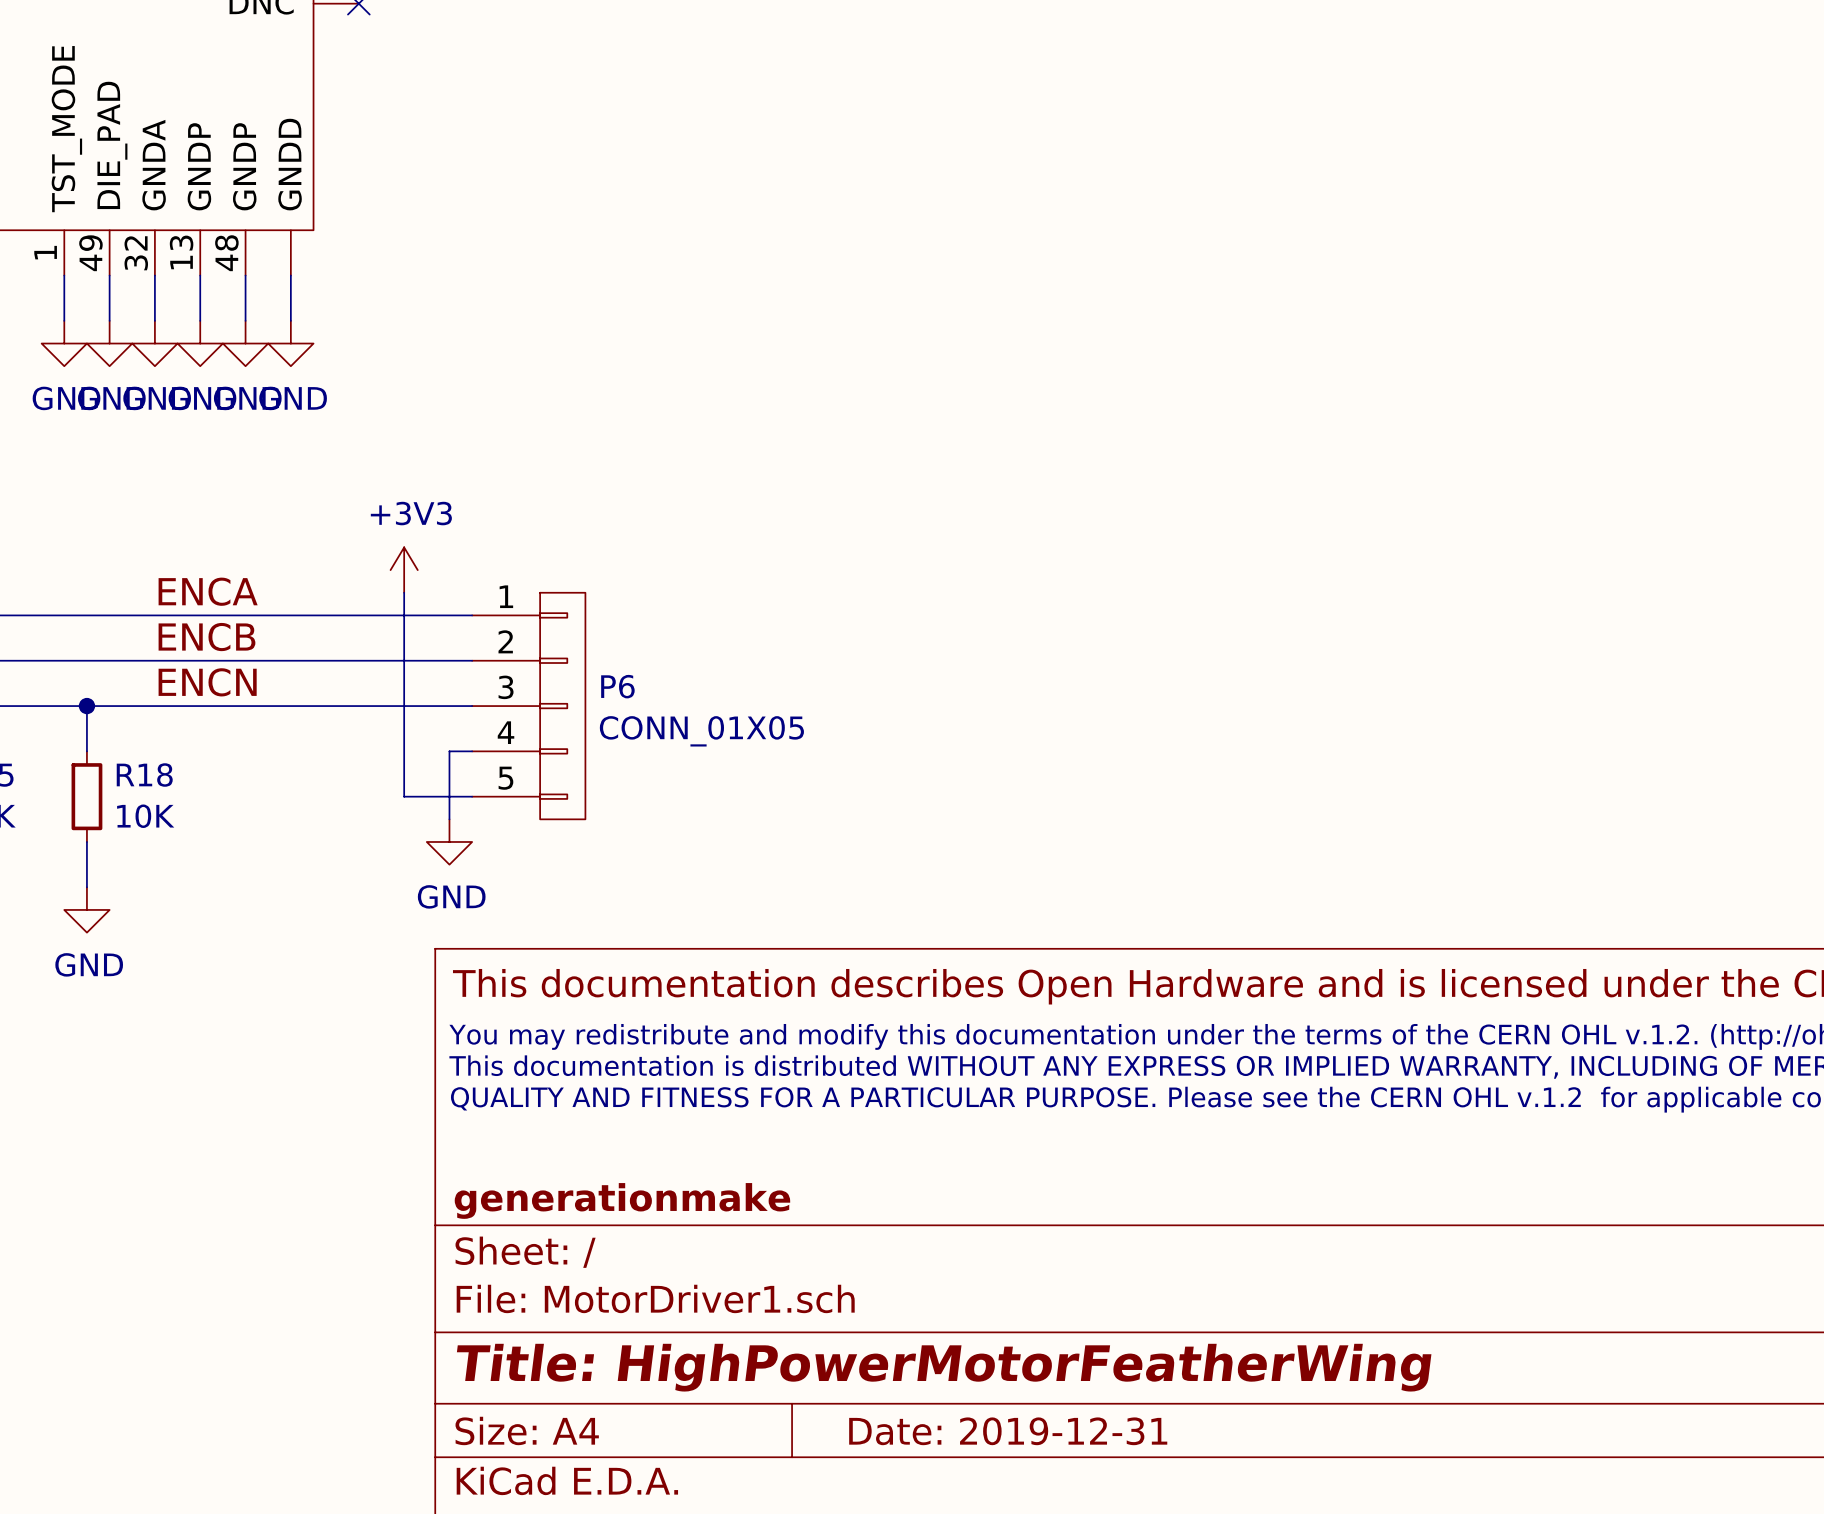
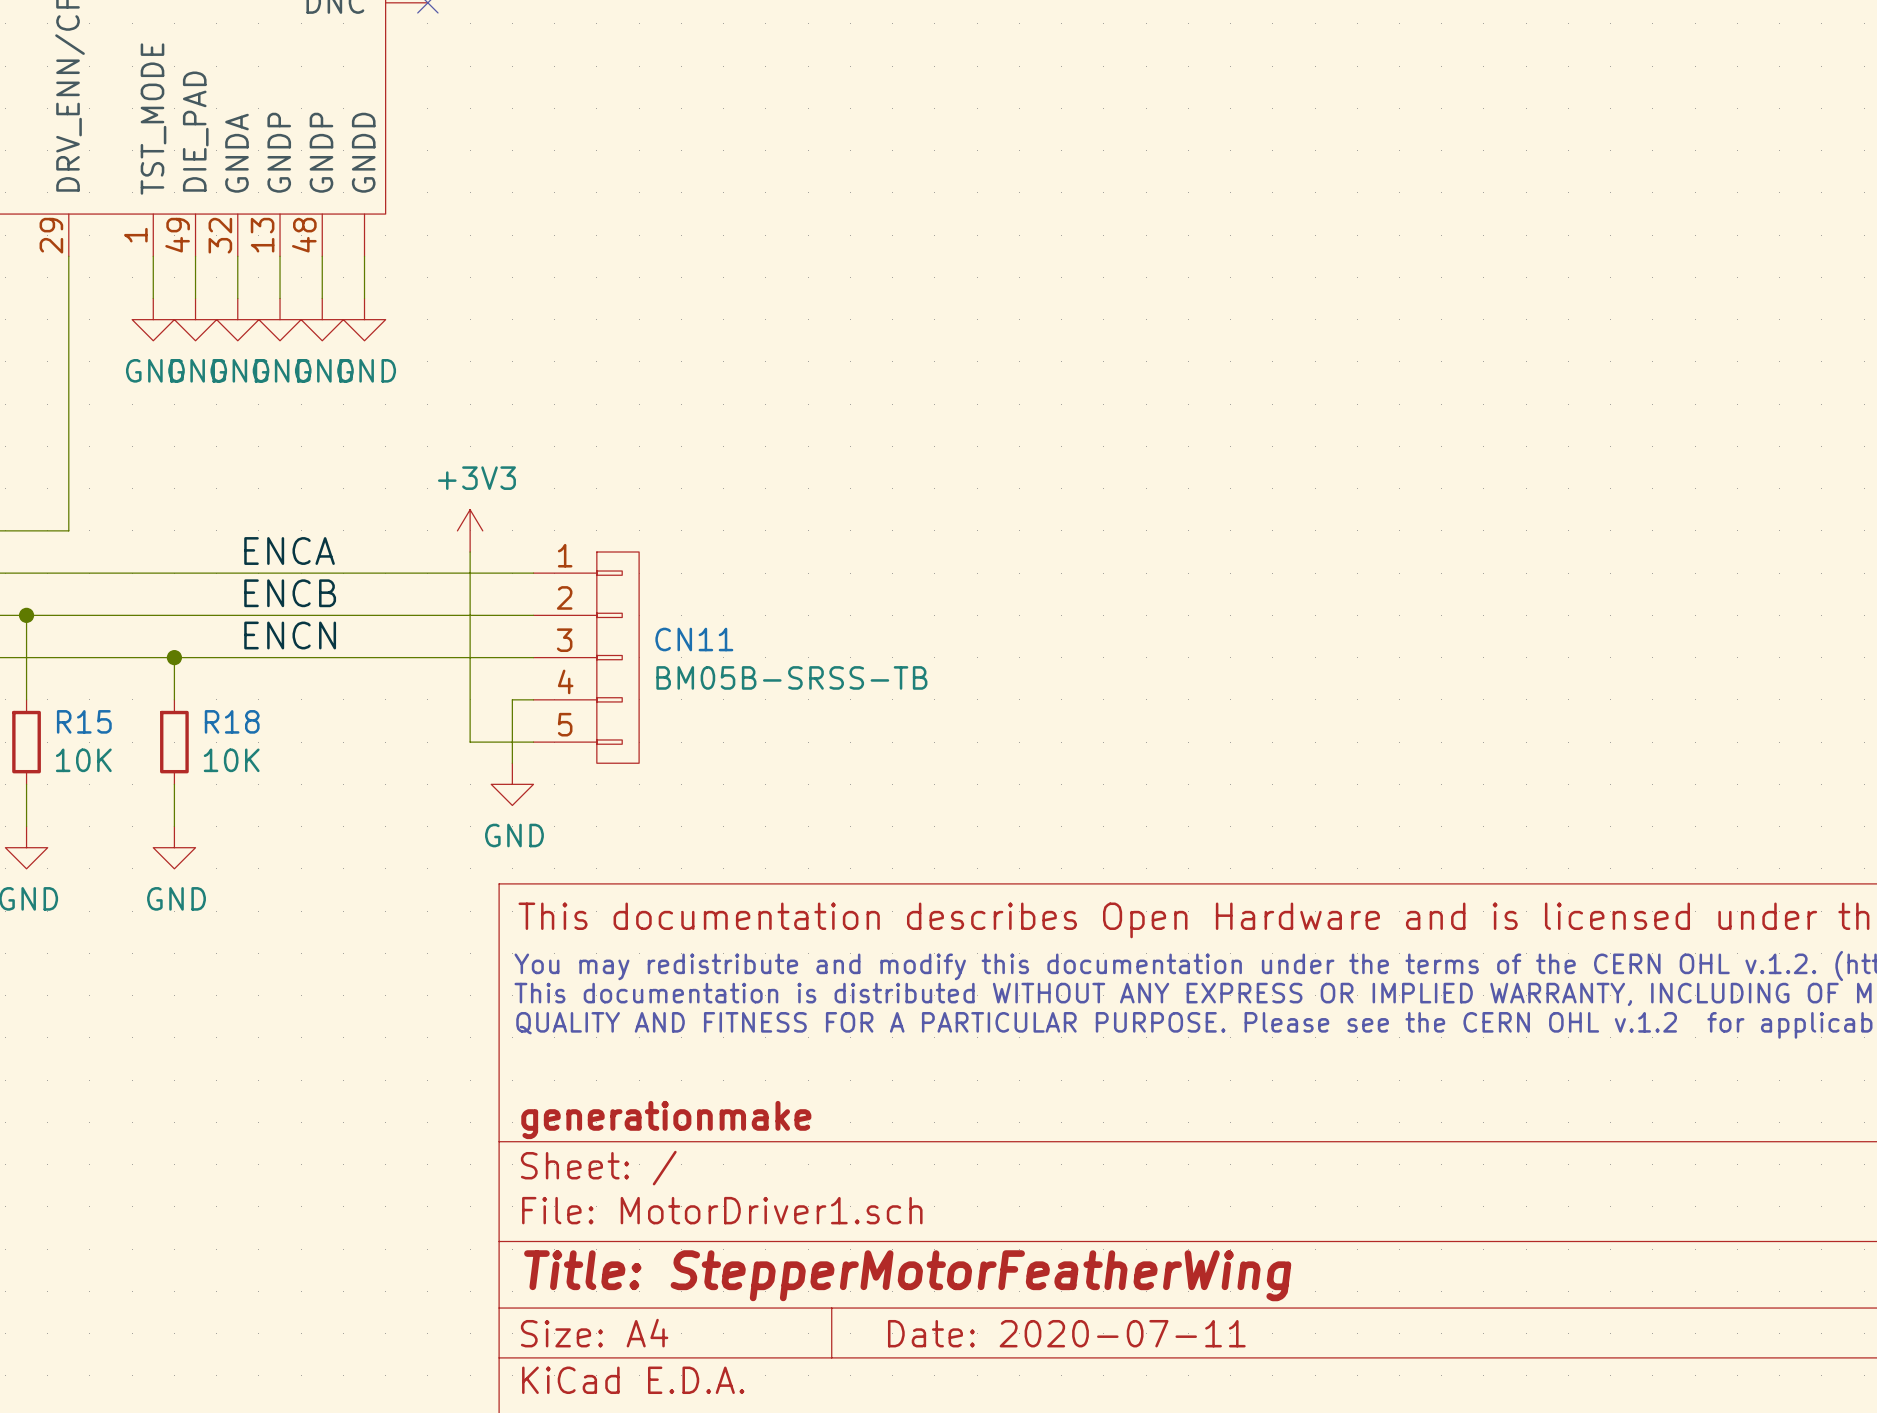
P6 name: P6 (617, 686) -> CN11 (694, 639)
P6 value: CONN_01X05 (701, 731) -> BM05B-SRSS-TB (791, 677)
title block: Title: HighPowerMotorFeatherWing (944, 1367) -> Title: StepperMotorFeatherWing (907, 1275)
title block: Date: 2019-12-31 (1008, 1431) -> Date: 2020-07-11 (1066, 1333)

